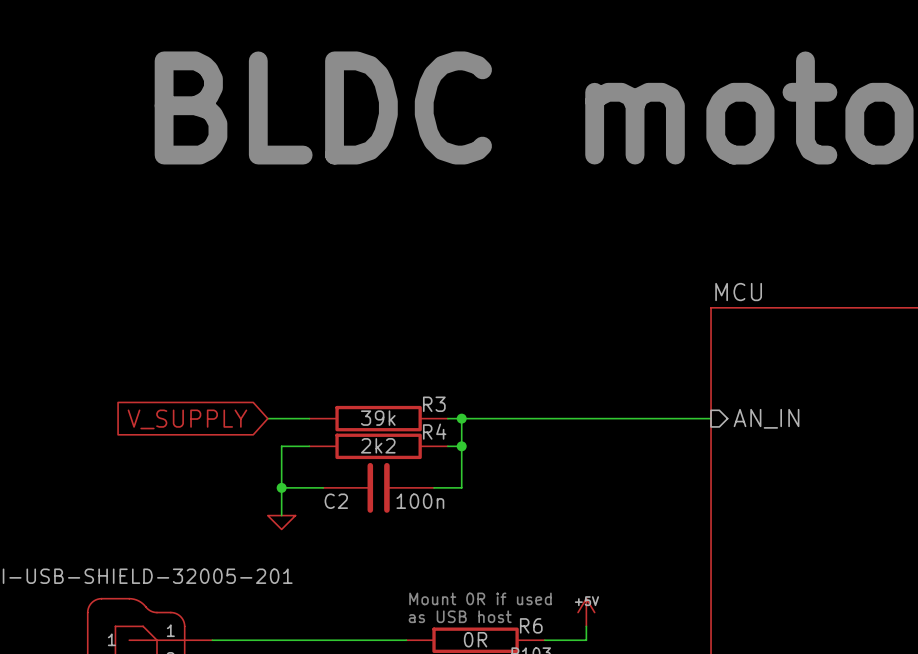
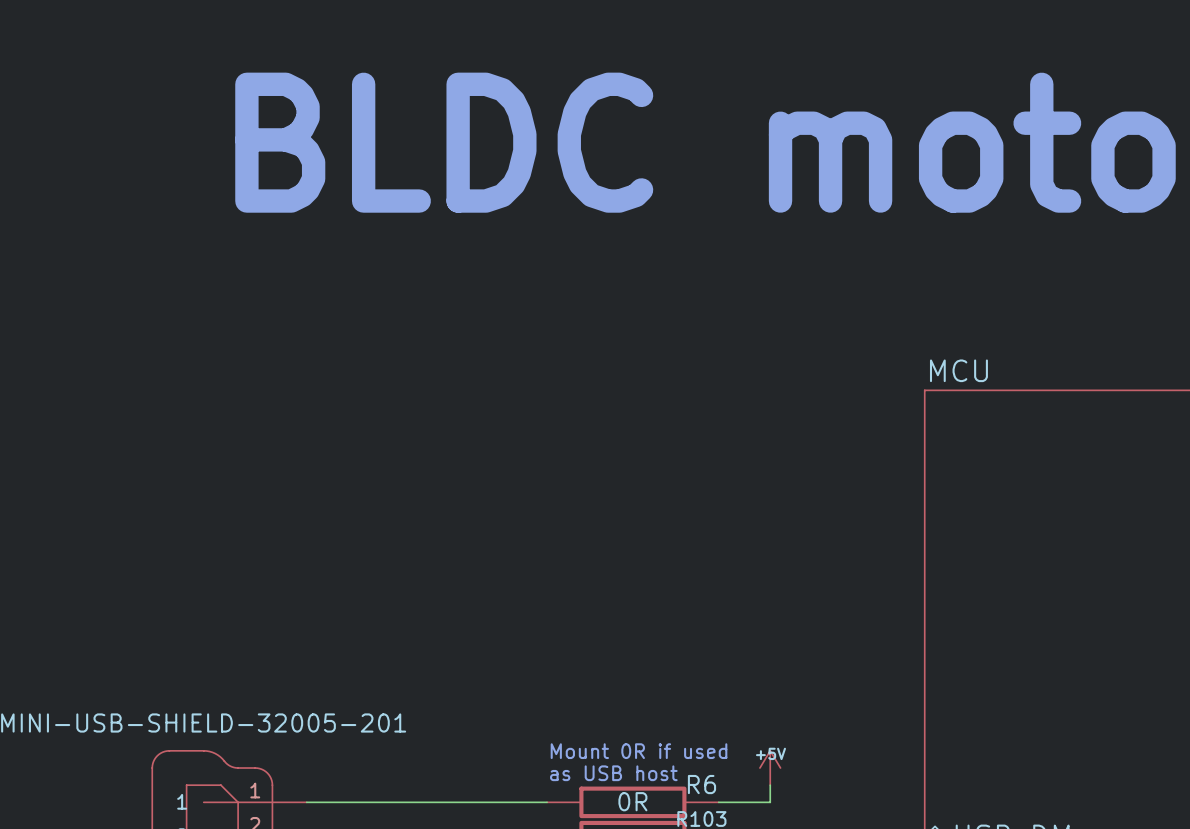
wire: (267, 418) (309, 418) -> none
R3: 39k (378, 418) -> none
wire: (447, 418) (711, 418) -> none
wire: (461, 418) (461, 487) (434, 487) -> none
junction: (461, 418) -> none
sheet pin: AN_IN (766, 418) -> none
global label: V_SUPPLY (187, 419) -> none
wire: (309, 446) (281, 446) (281, 515) -> none
R4: 2k2 (378, 446) -> none
wire: (447, 446) (461, 446) -> none
junction: (461, 446) -> none
wire: (281, 487) (323, 487) -> none
junction: (281, 487) -> none
C2: 100n (378, 487) -> none
power symbol: (281, 522) -> none

